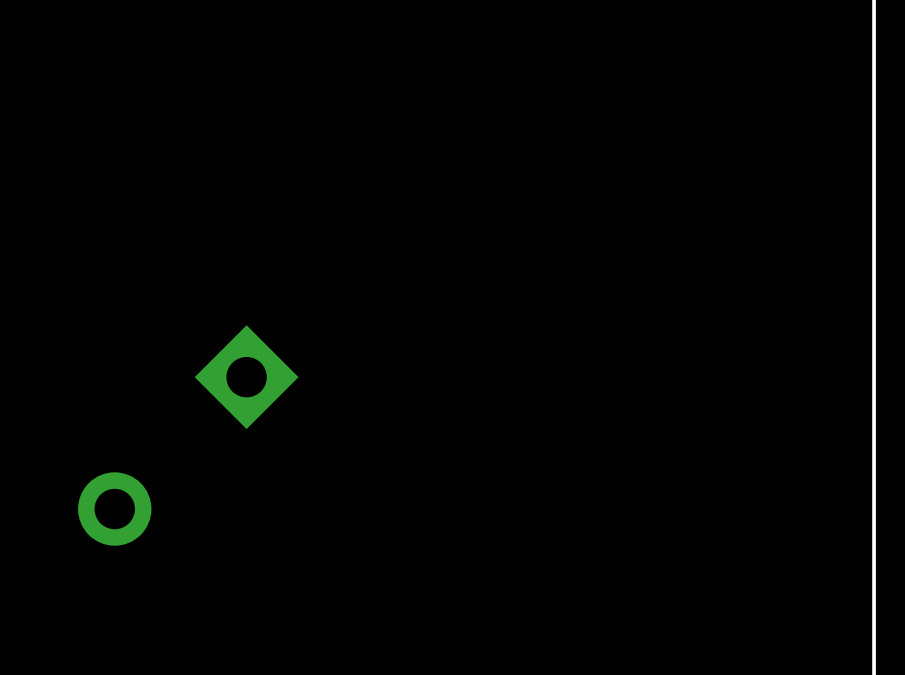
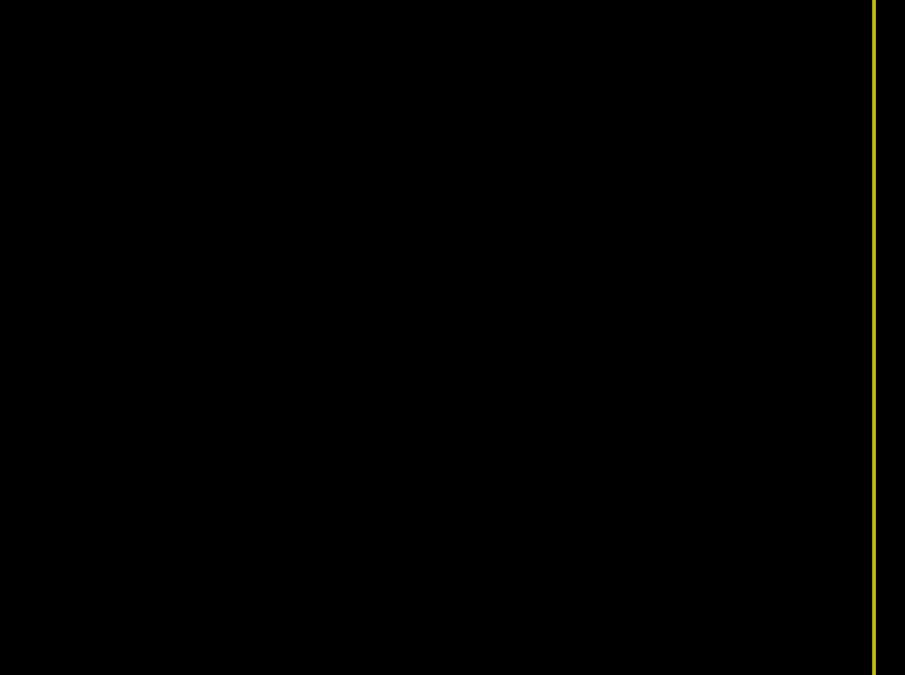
part: (188, 435) -> none

